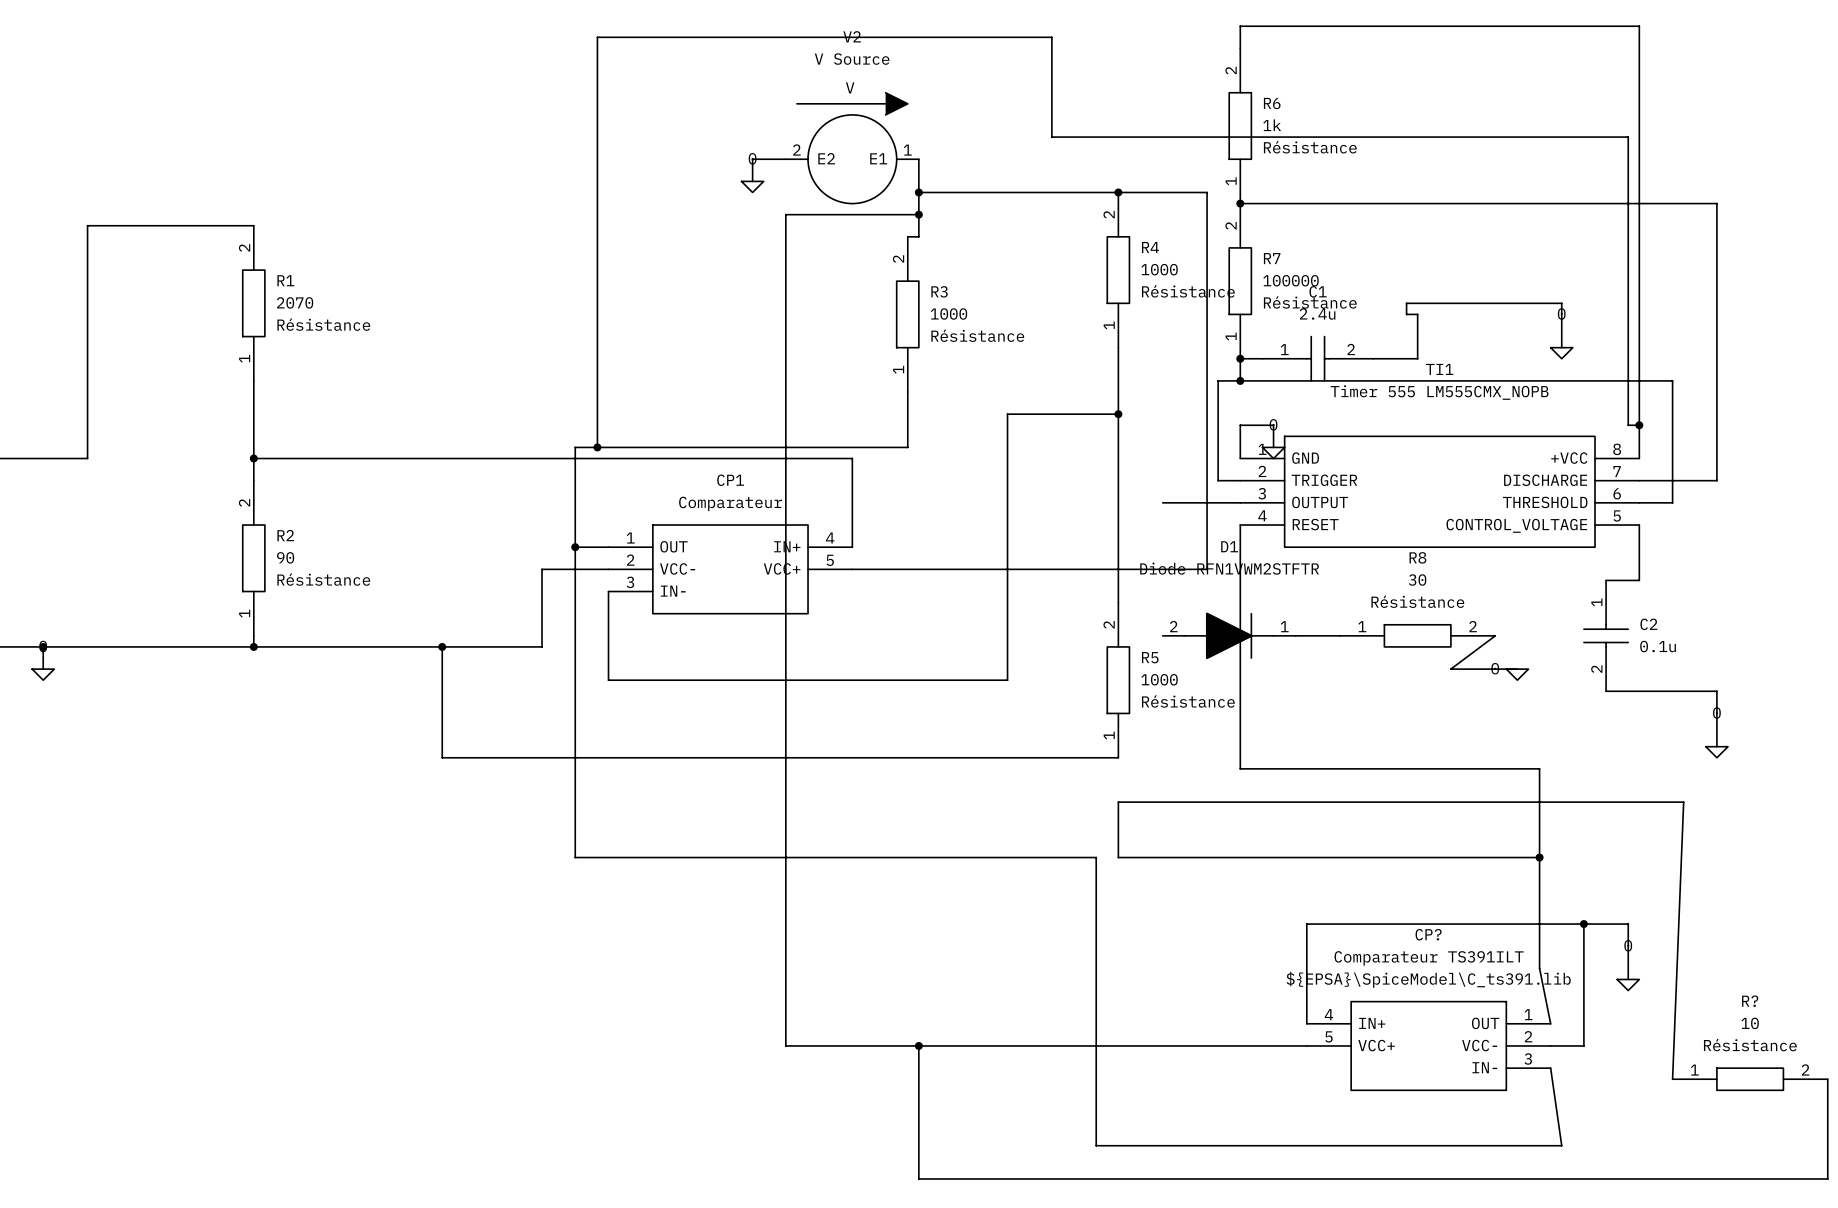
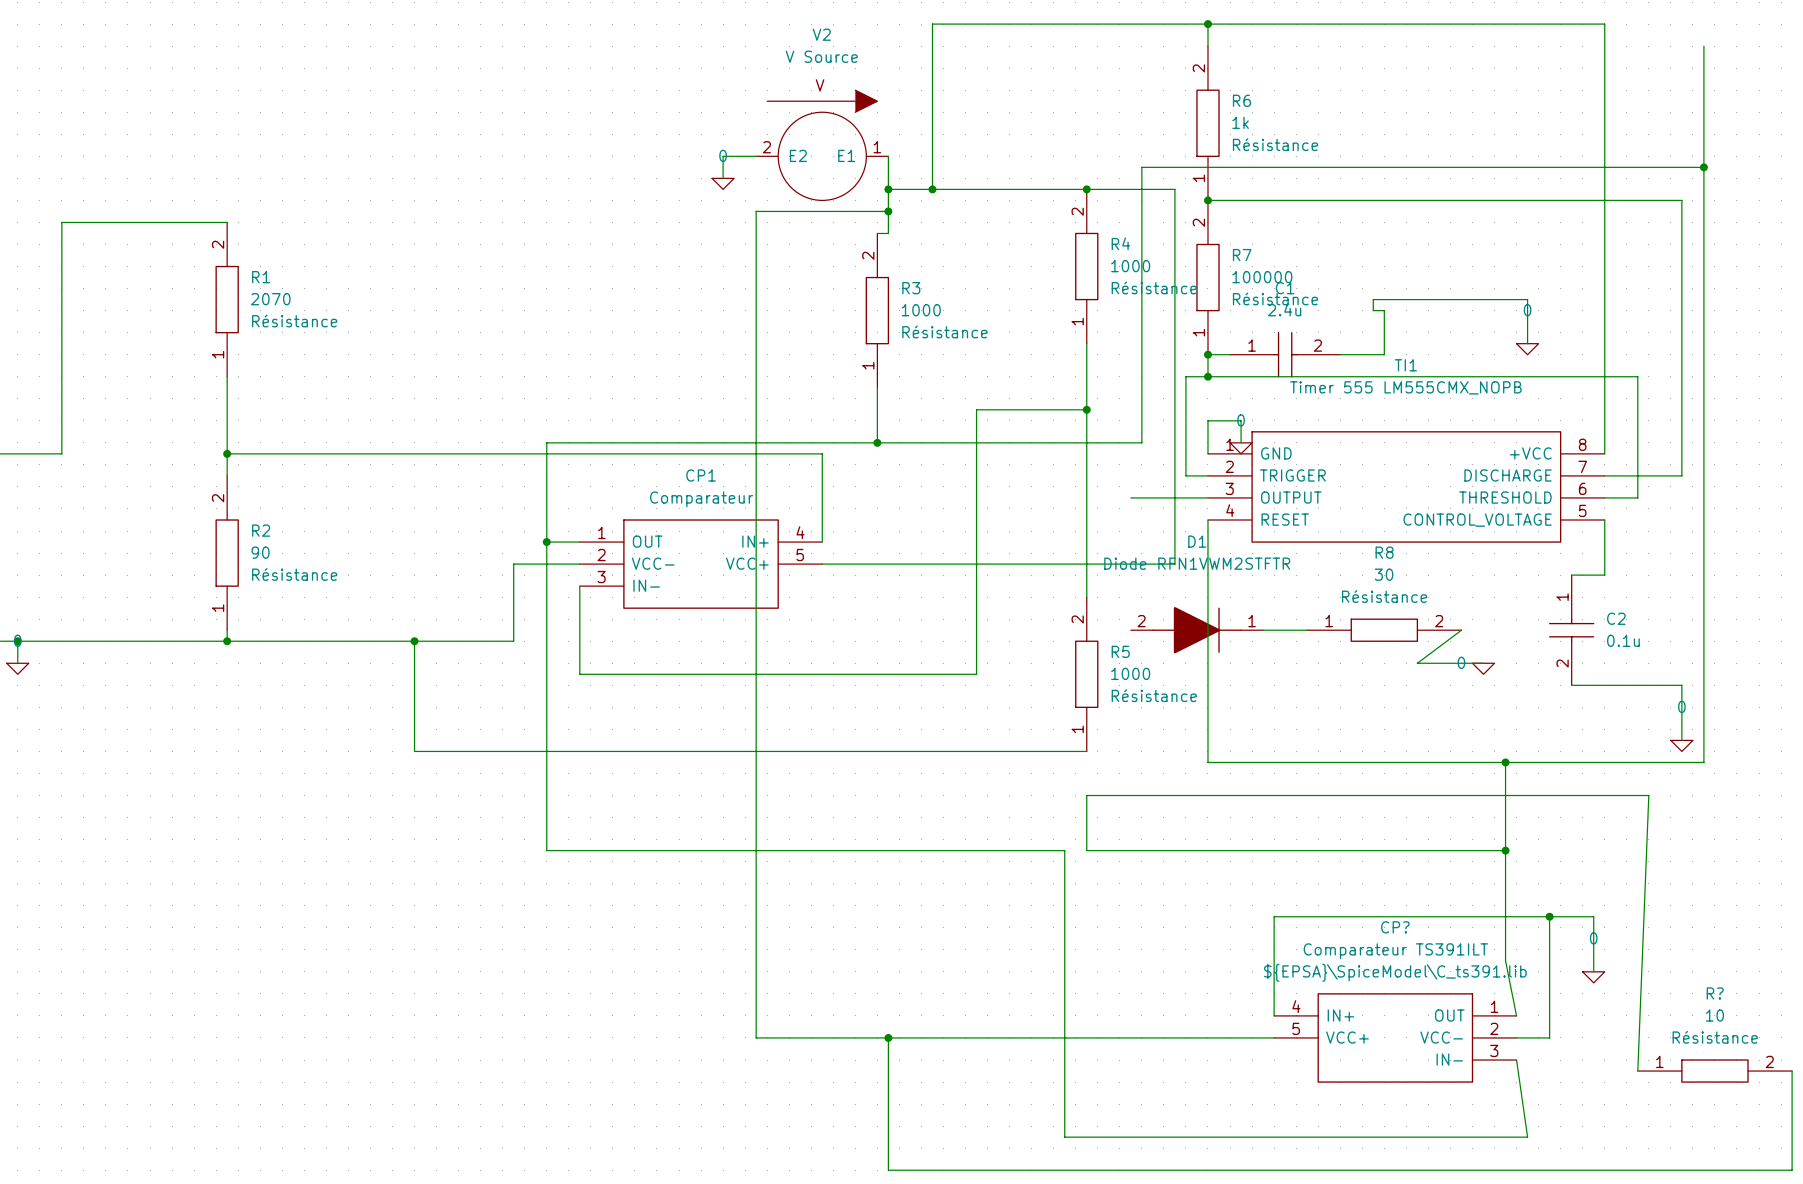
wire: none -> (1207, 24) (932, 24) (932, 189)
junction: none -> (1207, 24)
wire: none -> (1703, 46) (1703, 762) (1505, 762)
wire: none -> (1703, 167) (1141, 167) (1141, 442) (877, 442)
junction: none -> (1703, 167)
junction: none -> (932, 189)
wire: (1639, 425) (1628, 425) (1628, 137) (1051, 137) (1051, 37) (597, 37) (597, 447) -> none
junction: (1639, 425) -> none
junction: (597, 447) -> none
junction: none -> (877, 442)
junction: none -> (1505, 762)

